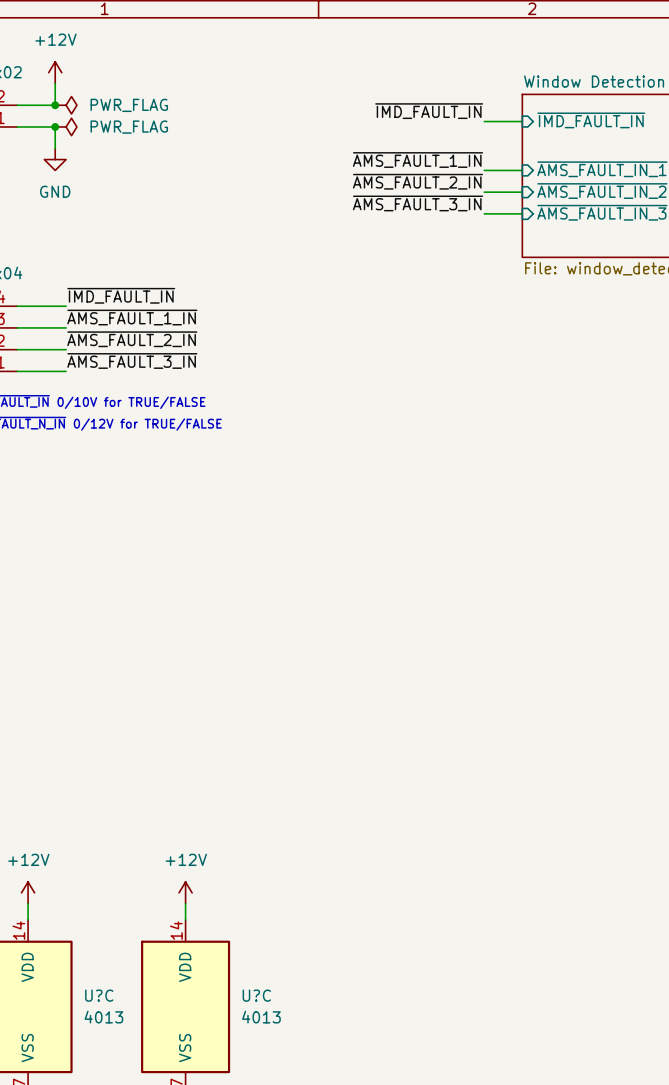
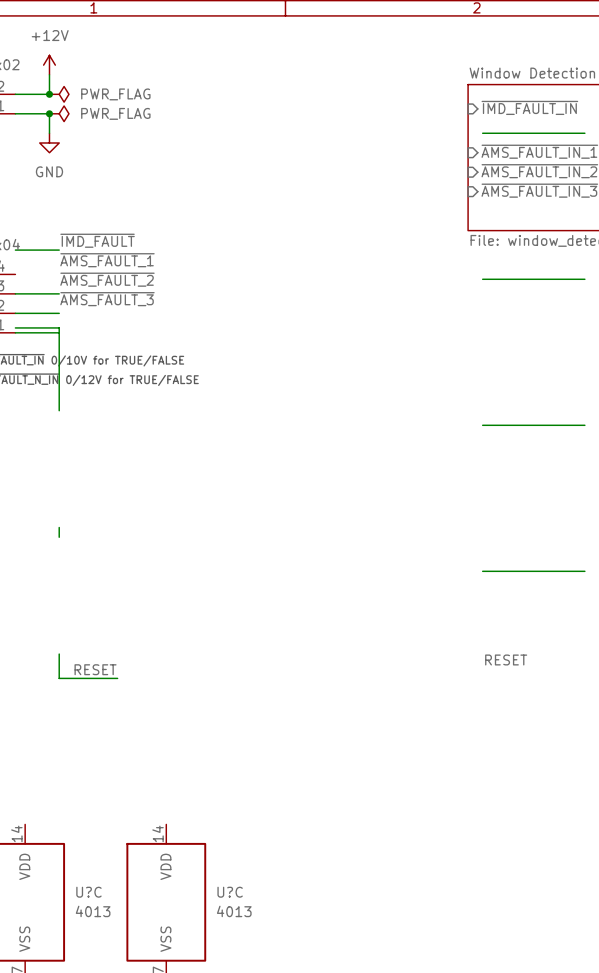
label: ~{IMD_FAULT_IN} (429, 111) -> none
wire: (484, 121) (522, 121) -> none
wire: none -> (482, 133) (584, 133)
label: ~{AMS_FAULT_1_IN} (417, 160) -> none
wire: (484, 170) (522, 170) -> none
label: ~{AMS_FAULT_2_IN} (417, 181) -> none
wire: (484, 192) (522, 192) -> none
label: ~{AMS_FAULT_3_IN} (417, 203) -> none
wire: (484, 213) (522, 213) -> none
label: none -> ~{IMD_FAULT} (97, 240)
label: ~{IMD_FAULT_IN} (121, 295) -> ~{AMS_FAULT_1} (107, 260)
wire: (17, 306) (66, 306) -> (15, 250) (59, 250)
wire: none -> (482, 279) (584, 279)
label: ~{AMS_FAULT_1_IN} (132, 317) -> ~{AMS_FAULT_2} (107, 279)
label: ~{AMS_FAULT_2_IN} (132, 339) -> ~{AMS_FAULT_3} (107, 299)
label: ~{AMS_FAULT_3_IN} (132, 360) -> none
wire: none -> (15, 327) (59, 327) (59, 410)
wire: none -> (482, 425) (584, 425)
wire: none -> (59, 527) (59, 537)
wire: none -> (482, 571) (584, 571)
wire: none -> (59, 654) (59, 678) (117, 678)
label: none -> RESET (506, 659)
label: none -> RESET (95, 669)
power symbol: +12V (28, 892) -> none
power symbol: +12V (185, 892) -> none
wire: (28, 903) (28, 920) -> none
wire: (185, 903) (185, 920) -> none

